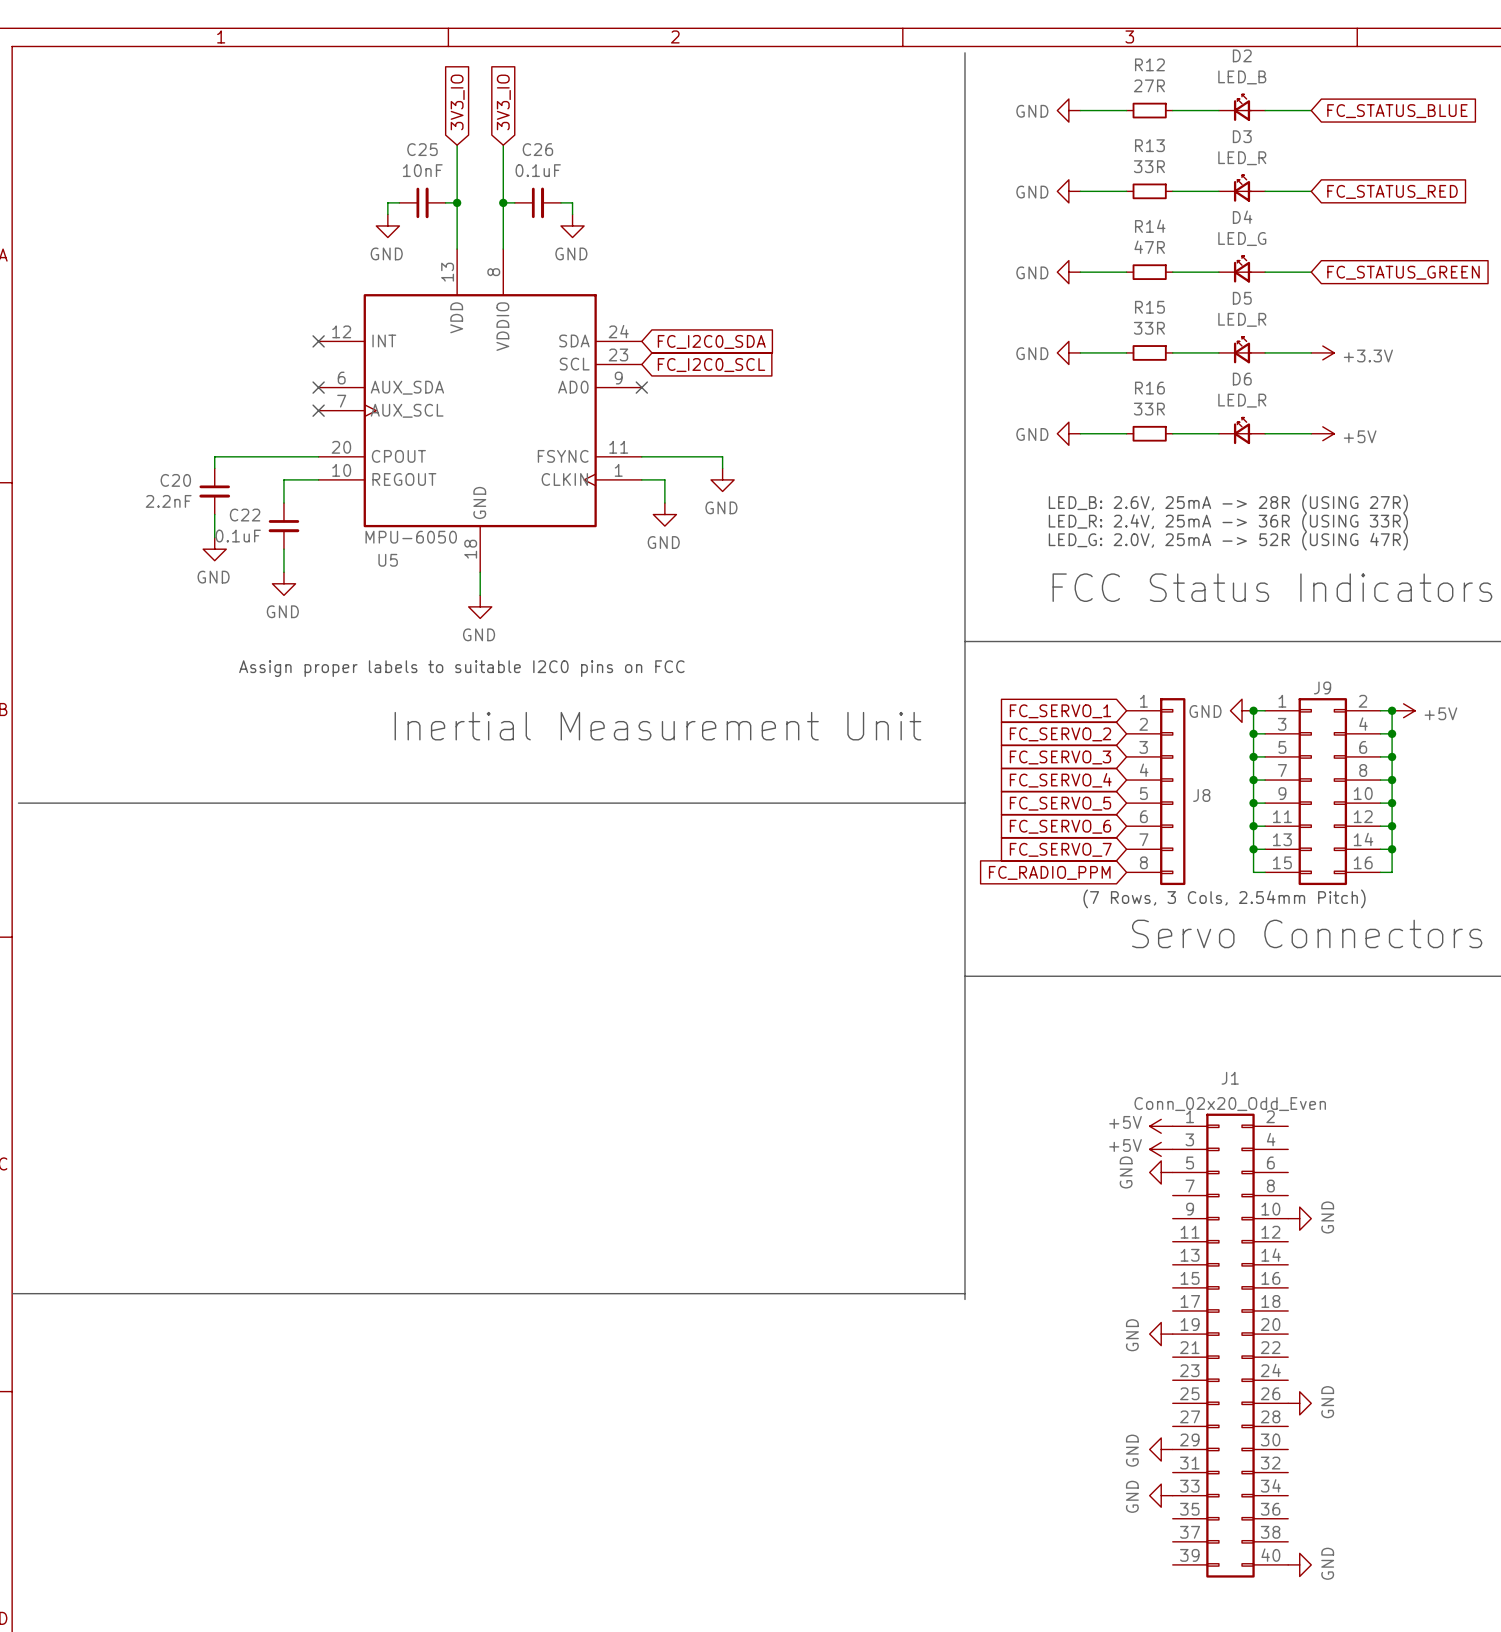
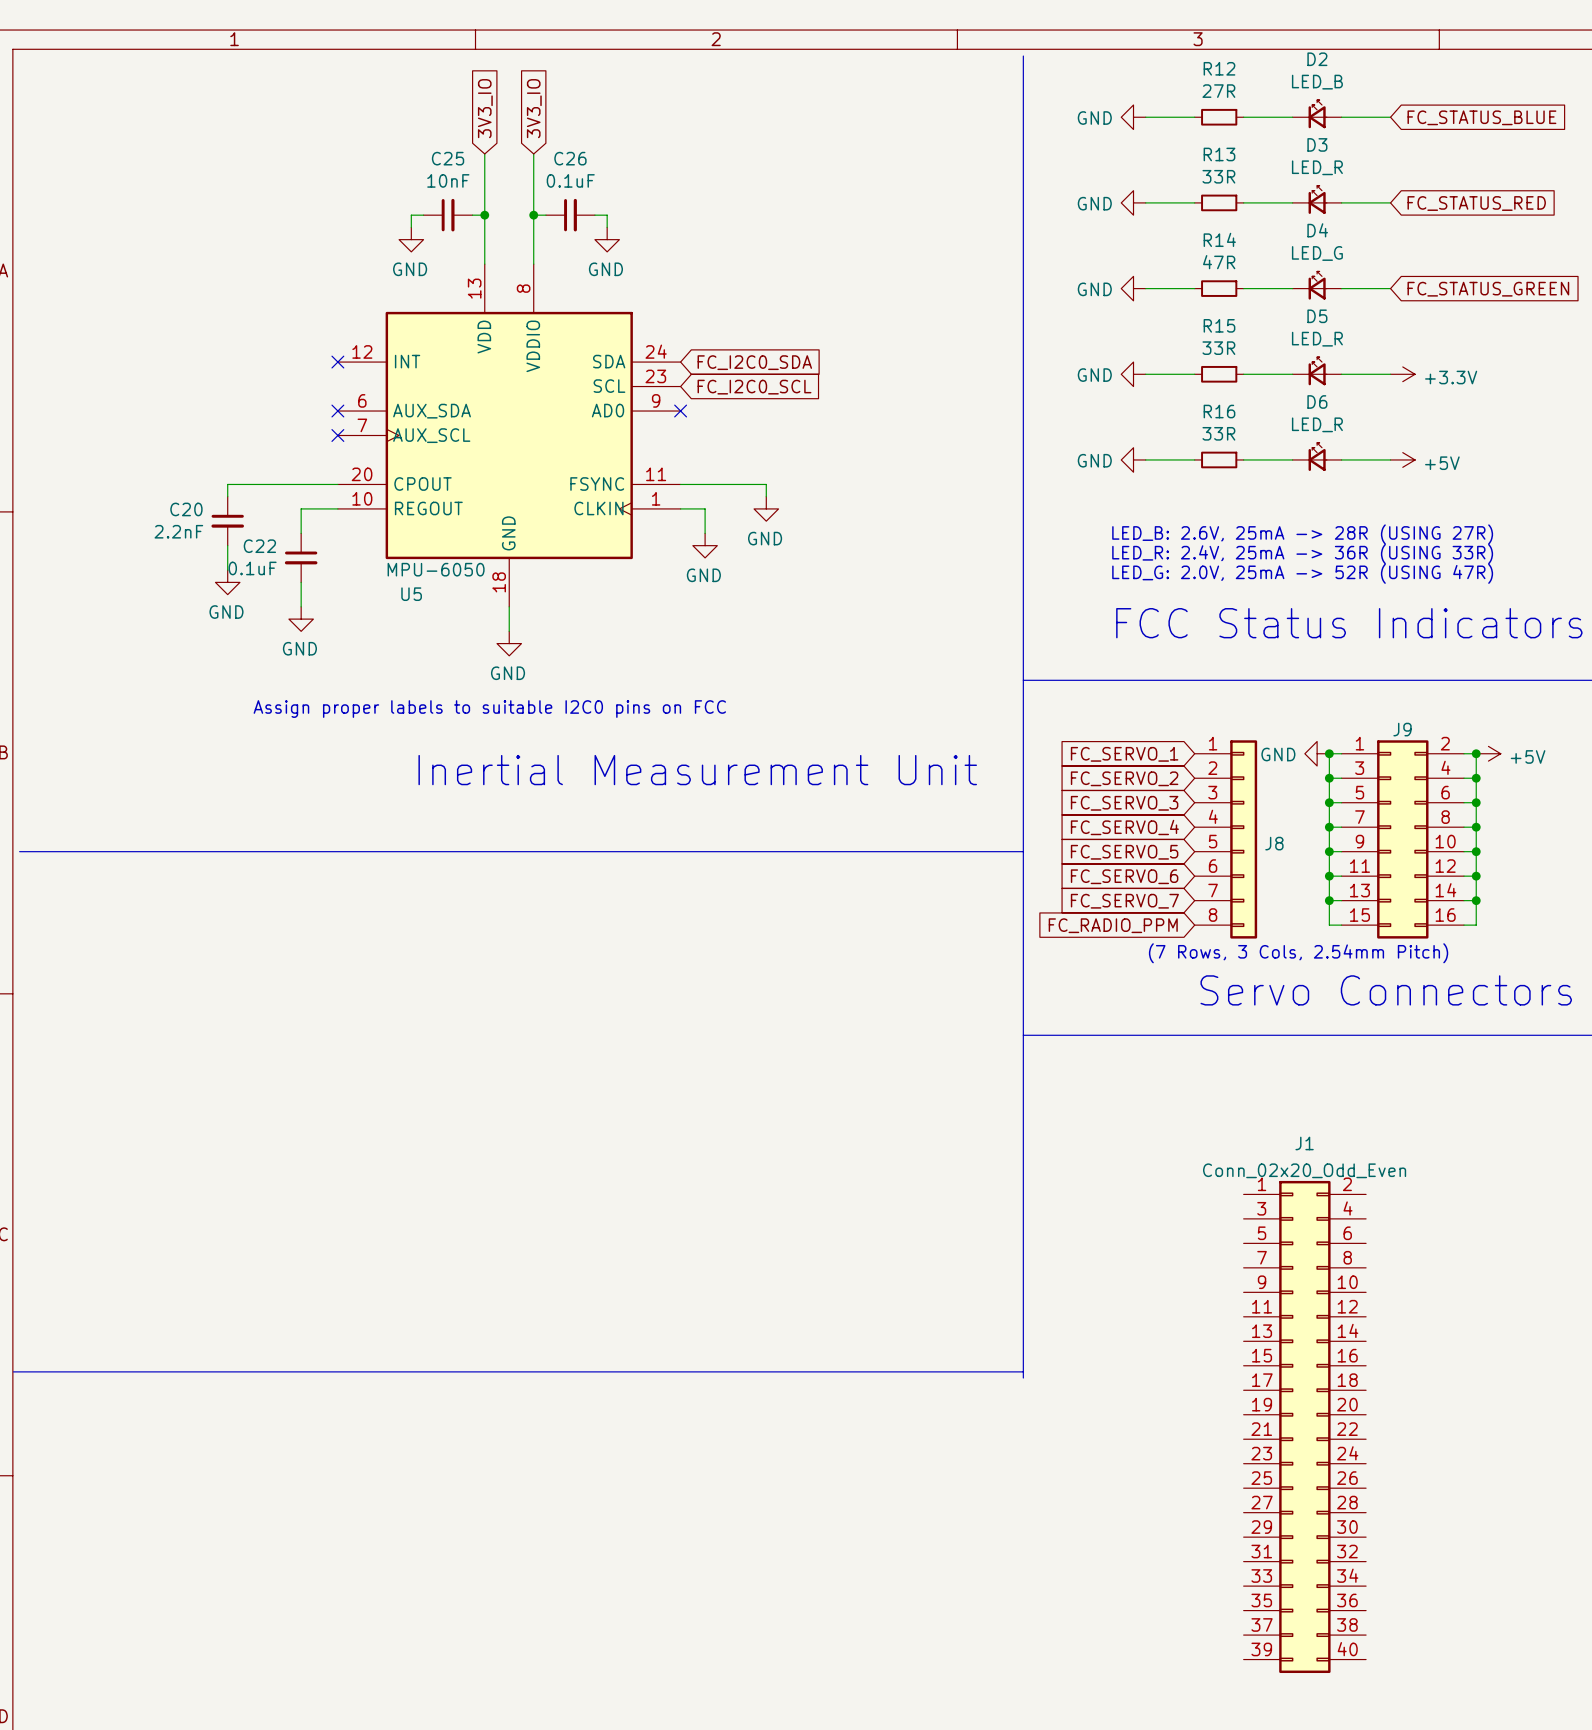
power symbol: +5V (1161, 1126) -> none
power symbol: +5V (1161, 1149) -> none
power symbol: GND (1161, 1172) -> none
power symbol: GND (1299, 1218) -> none
power symbol: GND (1161, 1334) -> none
power symbol: GND (1299, 1403) -> none
power symbol: GND (1161, 1449) -> none
power symbol: GND (1161, 1495) -> none
power symbol: GND (1299, 1564) -> none

